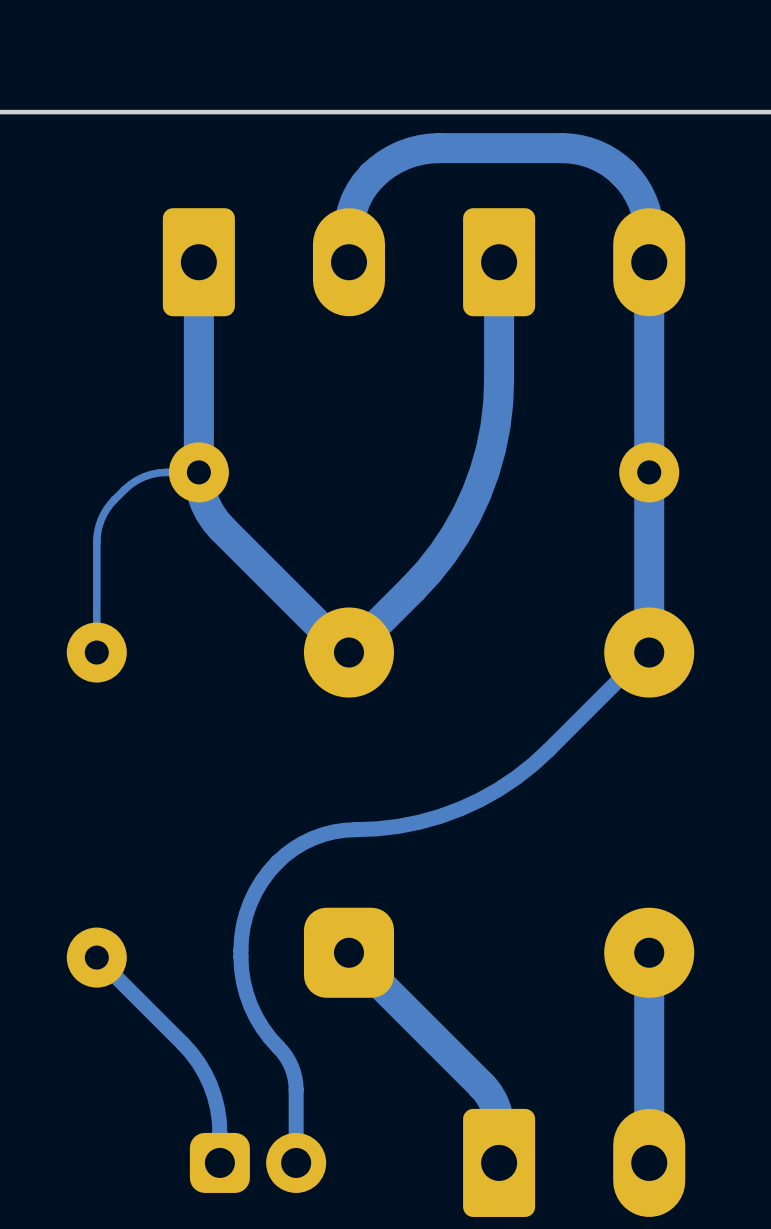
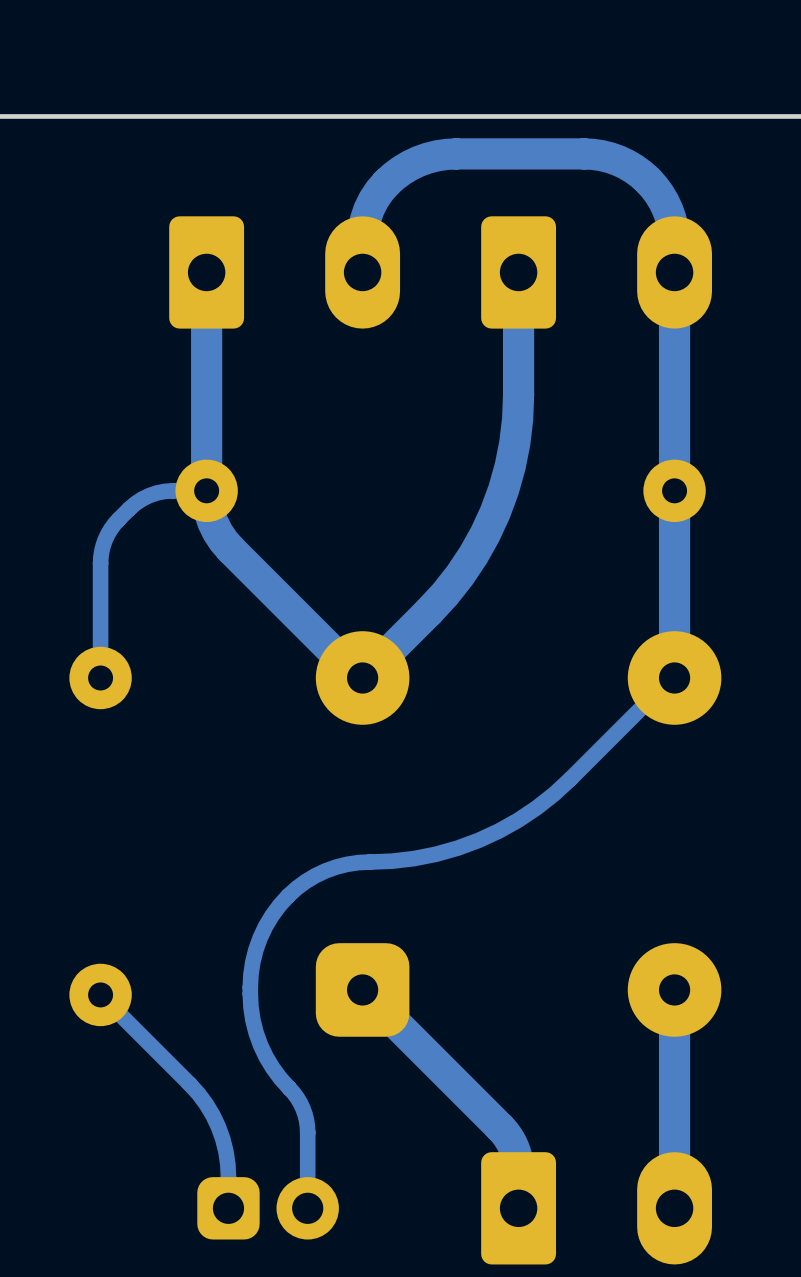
bottom track width: thin (198, 472) (158, 472) (143, 476) (124, 489) (103, 513) (97, 536) (96, 652) -> thick (206, 490) (165, 491) (149, 495) (129, 509) (107, 534) (100, 557) (100, 678)

